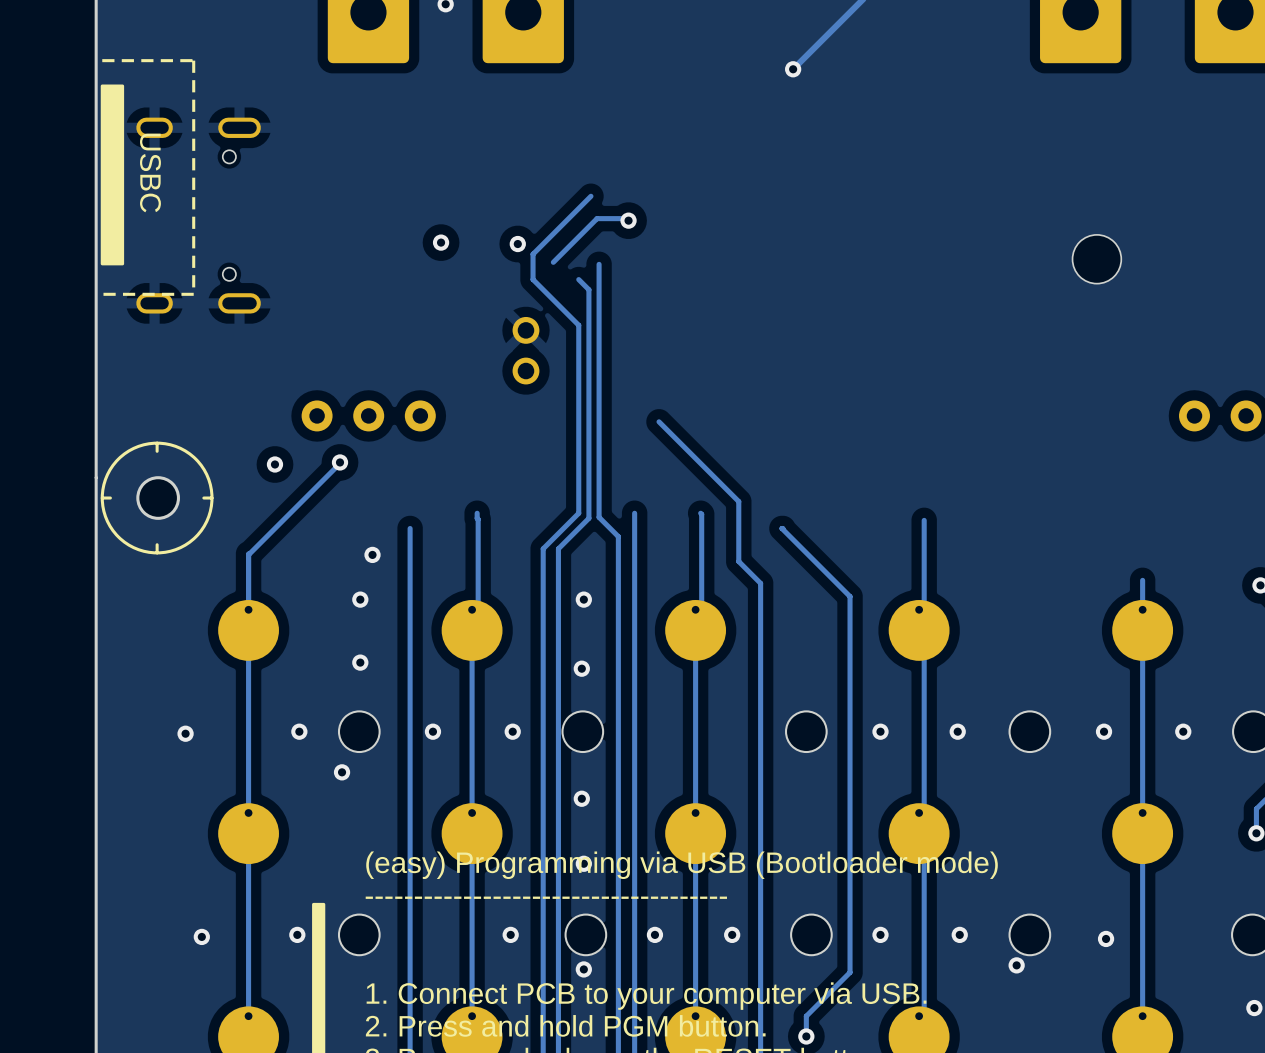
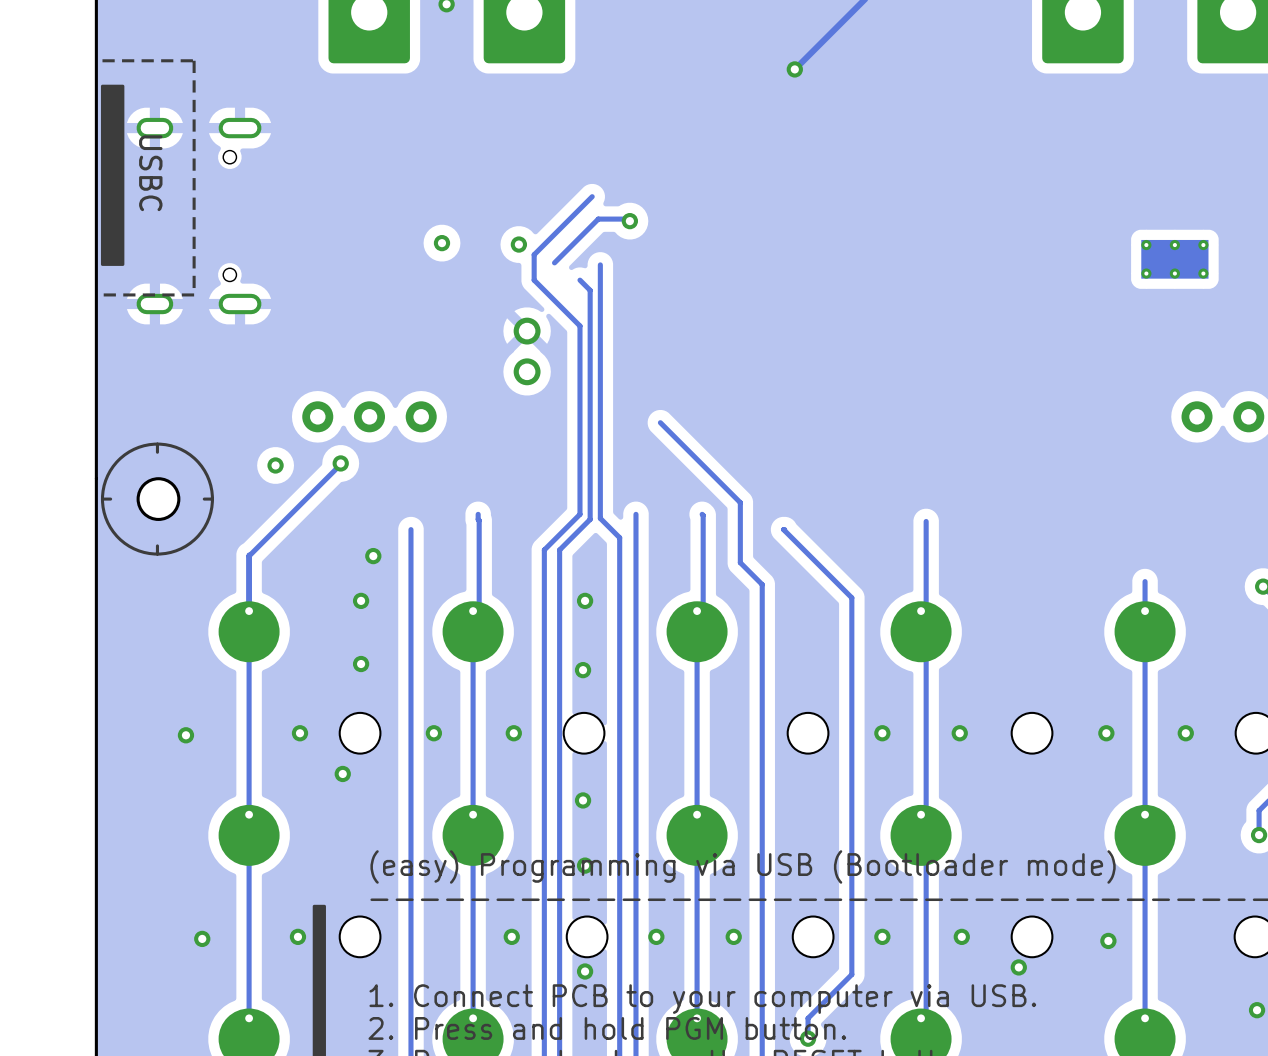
round board edge: [1072, 234, 1122, 285] -> none
part: none -> (1174, 259)

